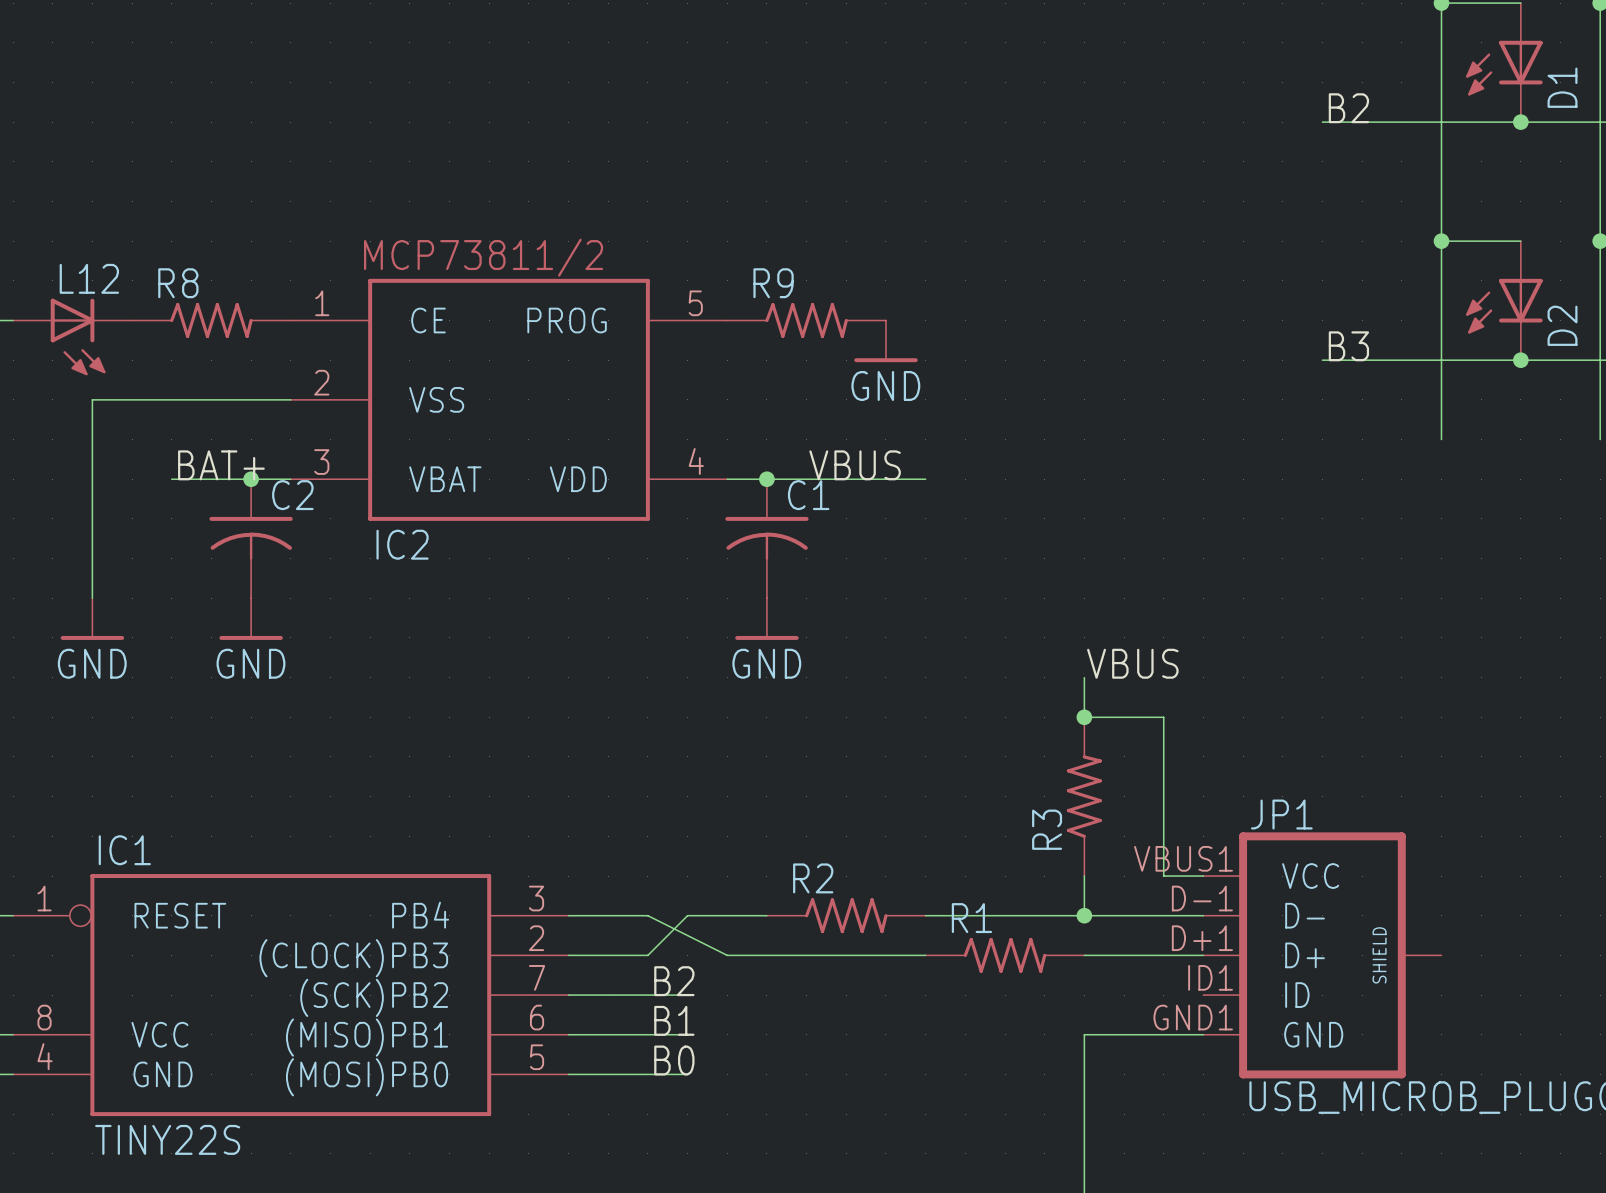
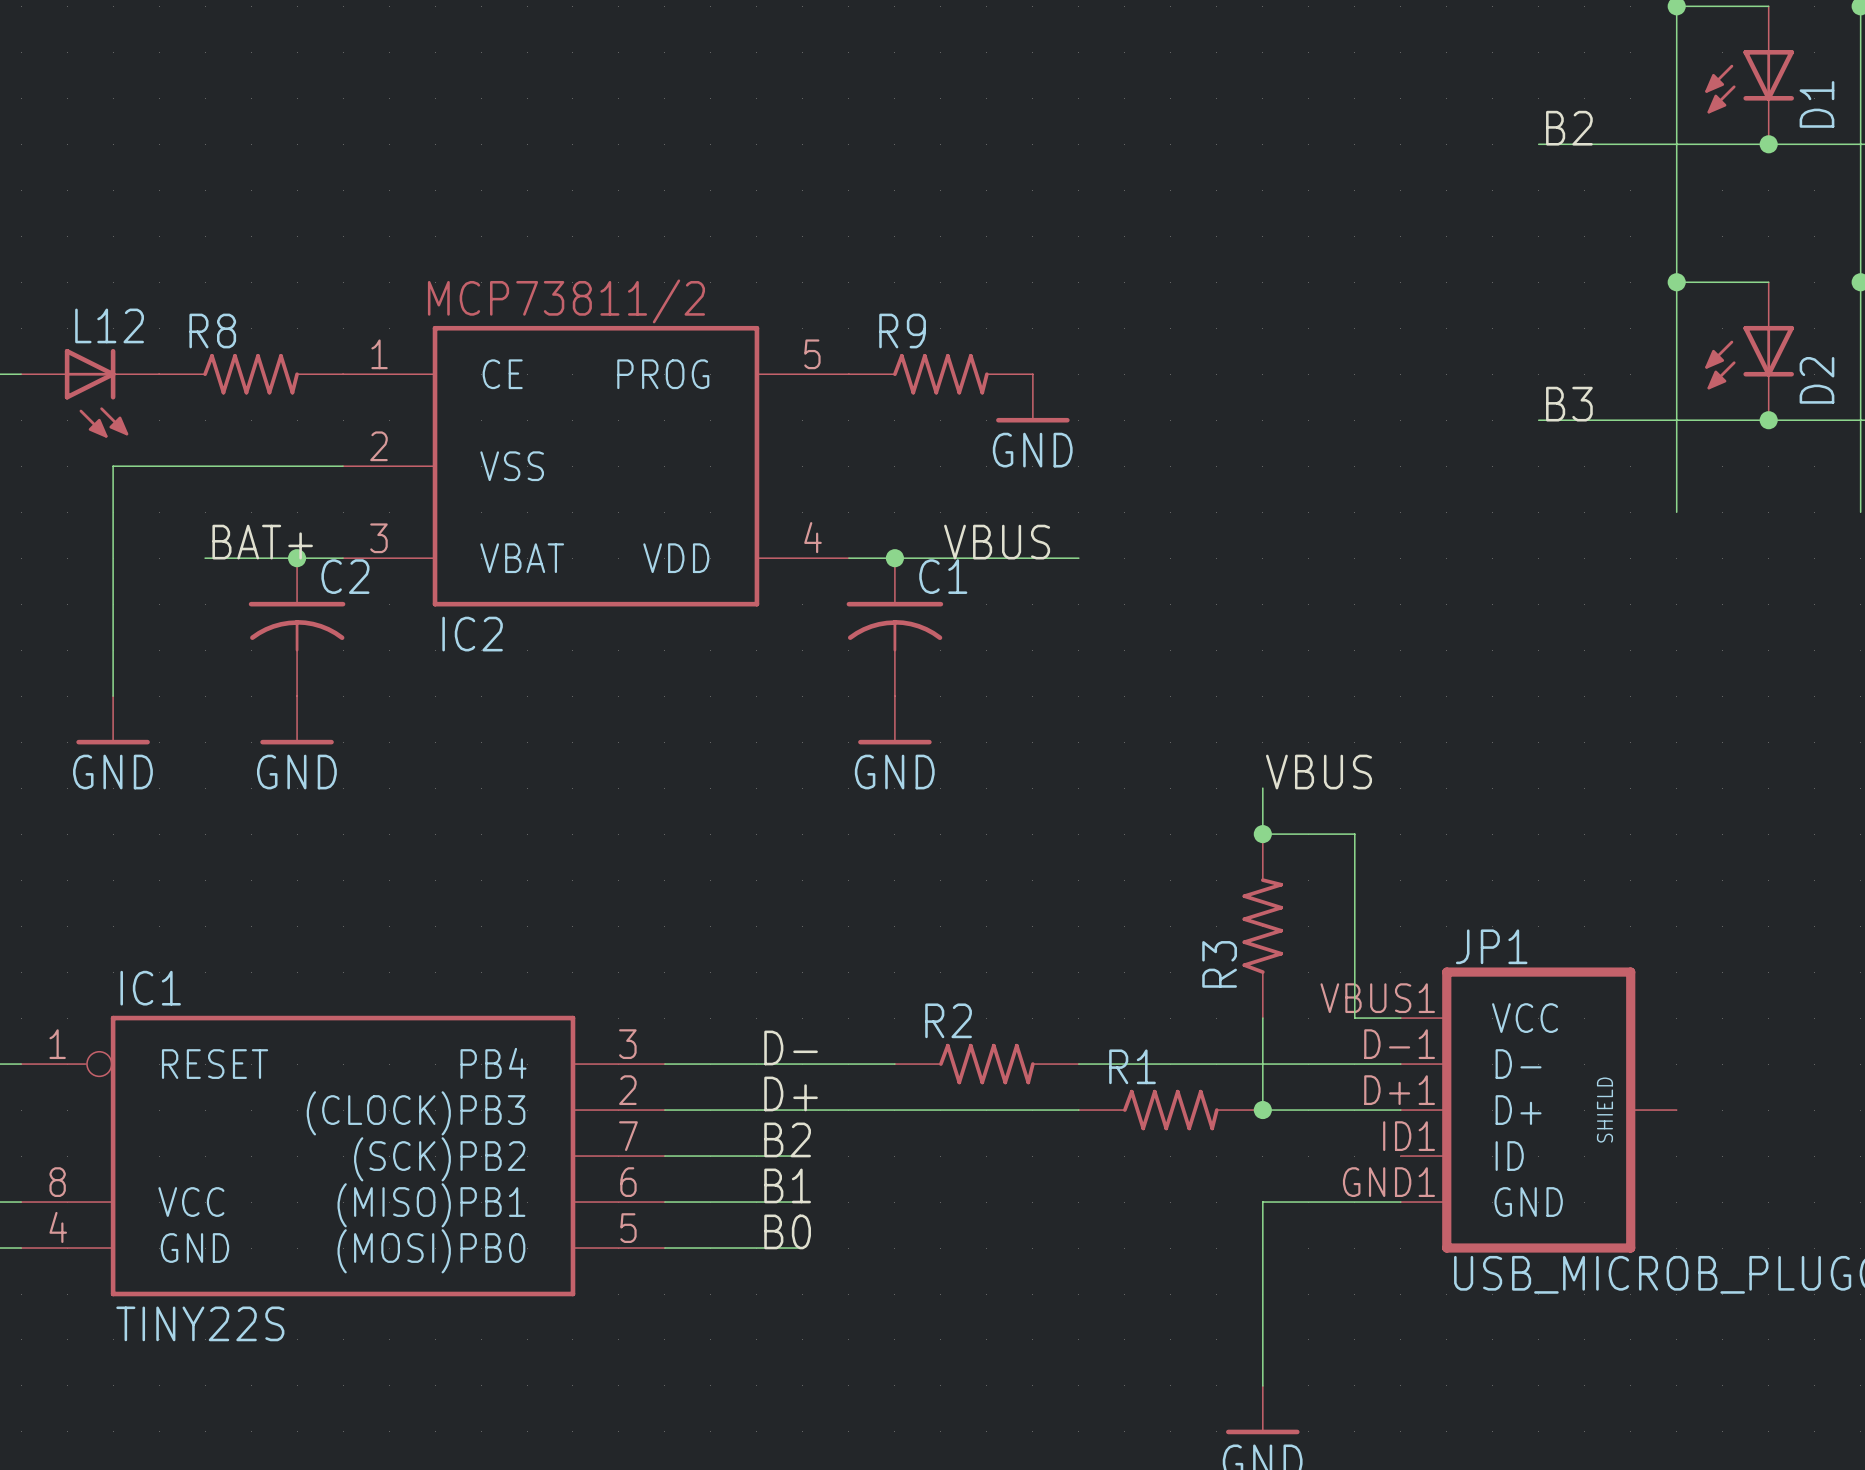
label: none -> D- (791, 1047)
wire: (647, 915) (727, 955) -> (756, 1110) (848, 1110)
wire: (687, 915) (647, 955) -> (802, 1064) (756, 1064)
wire: none -> (1262, 1064) (1262, 1110)
junction position: (1084, 915) -> (1262, 1110)
label: none -> D+ (791, 1093)

